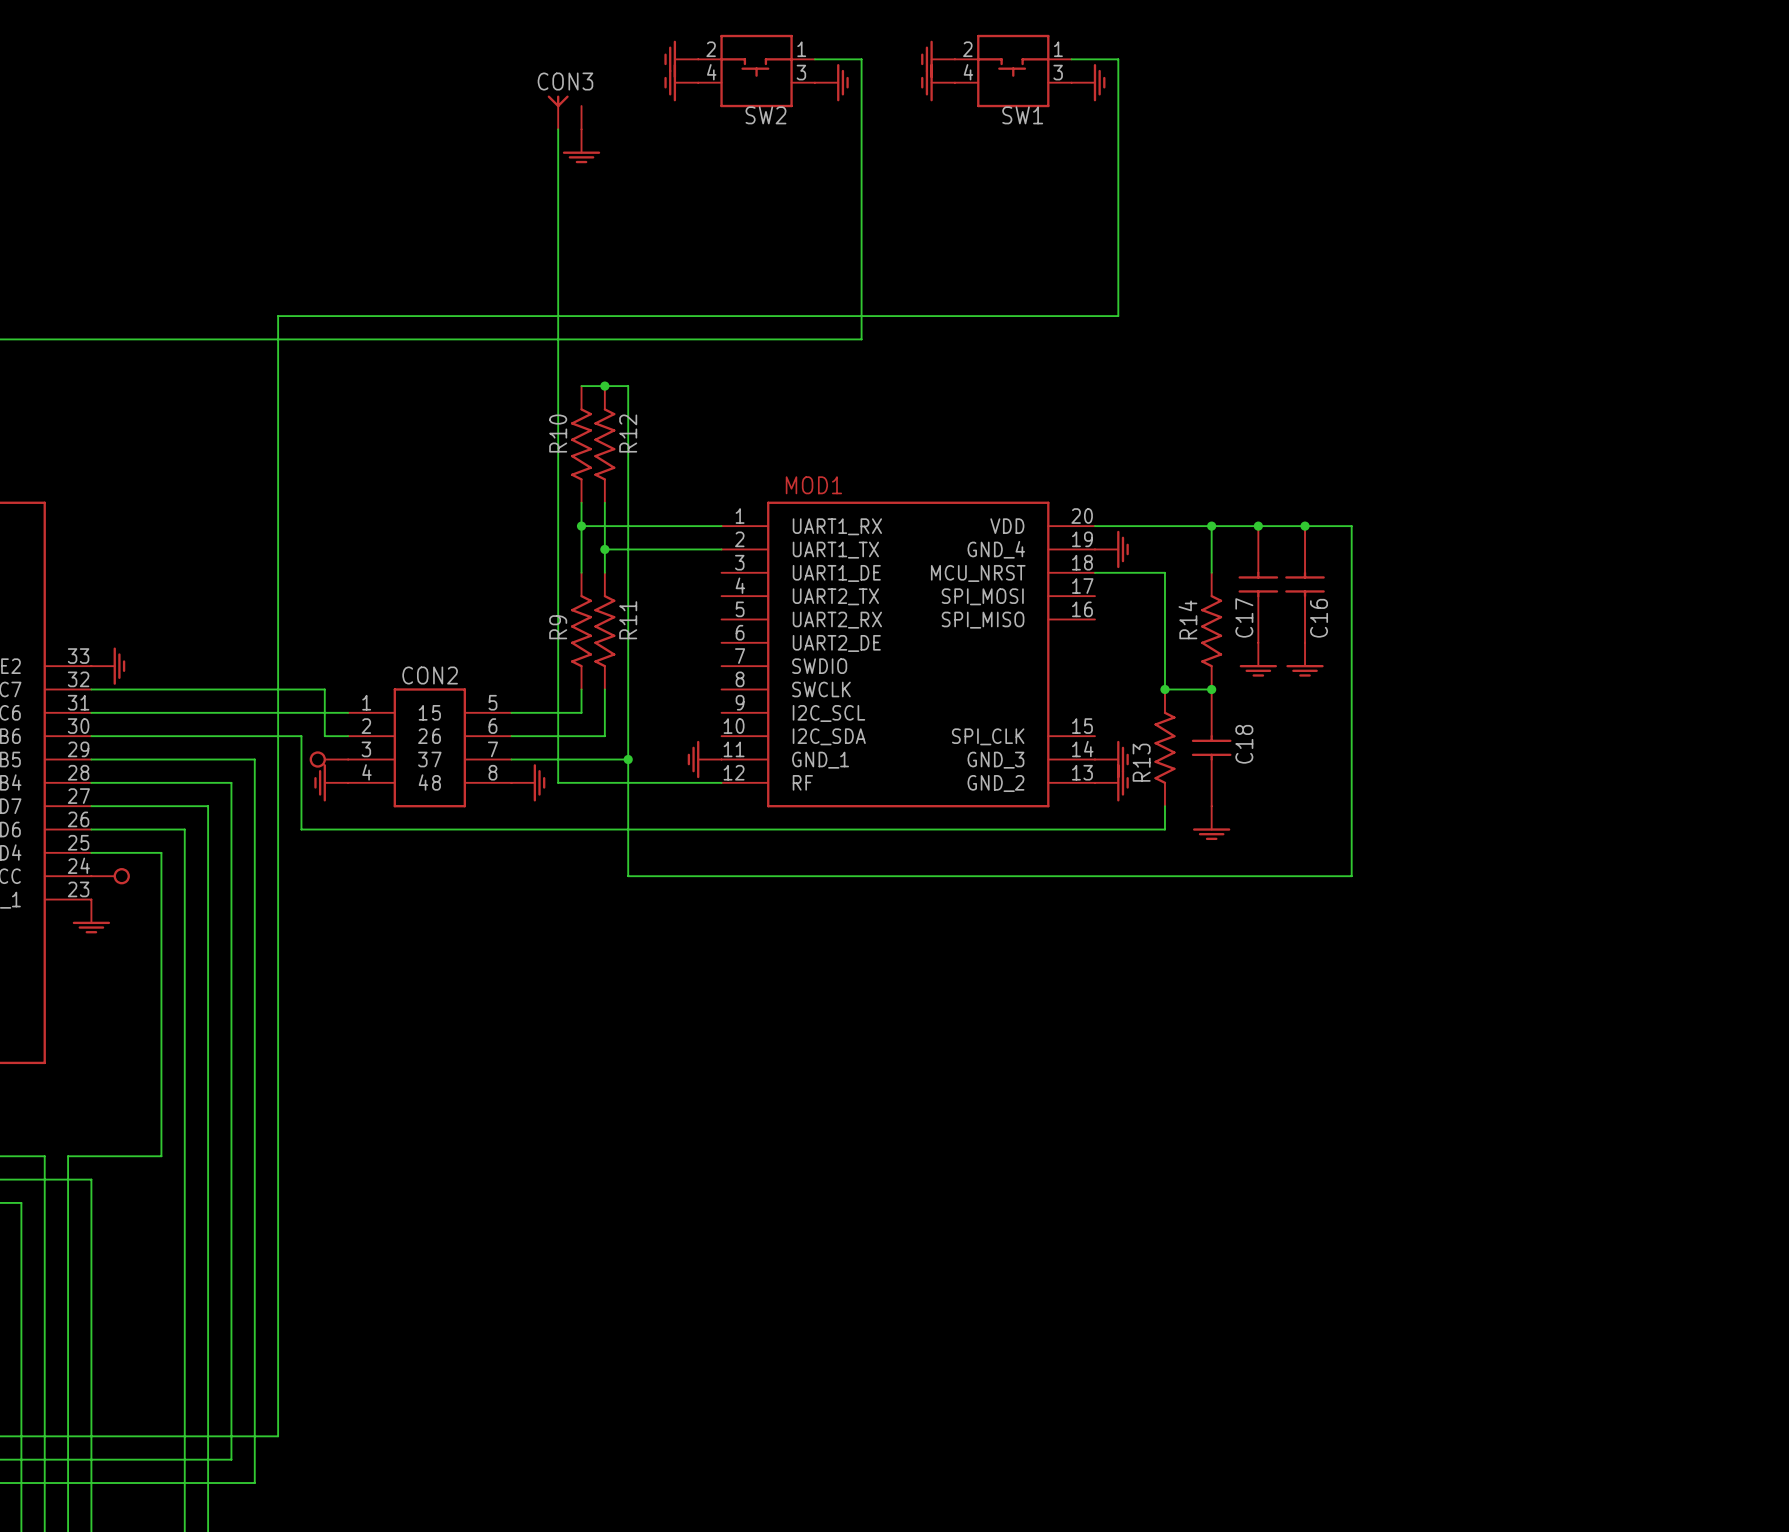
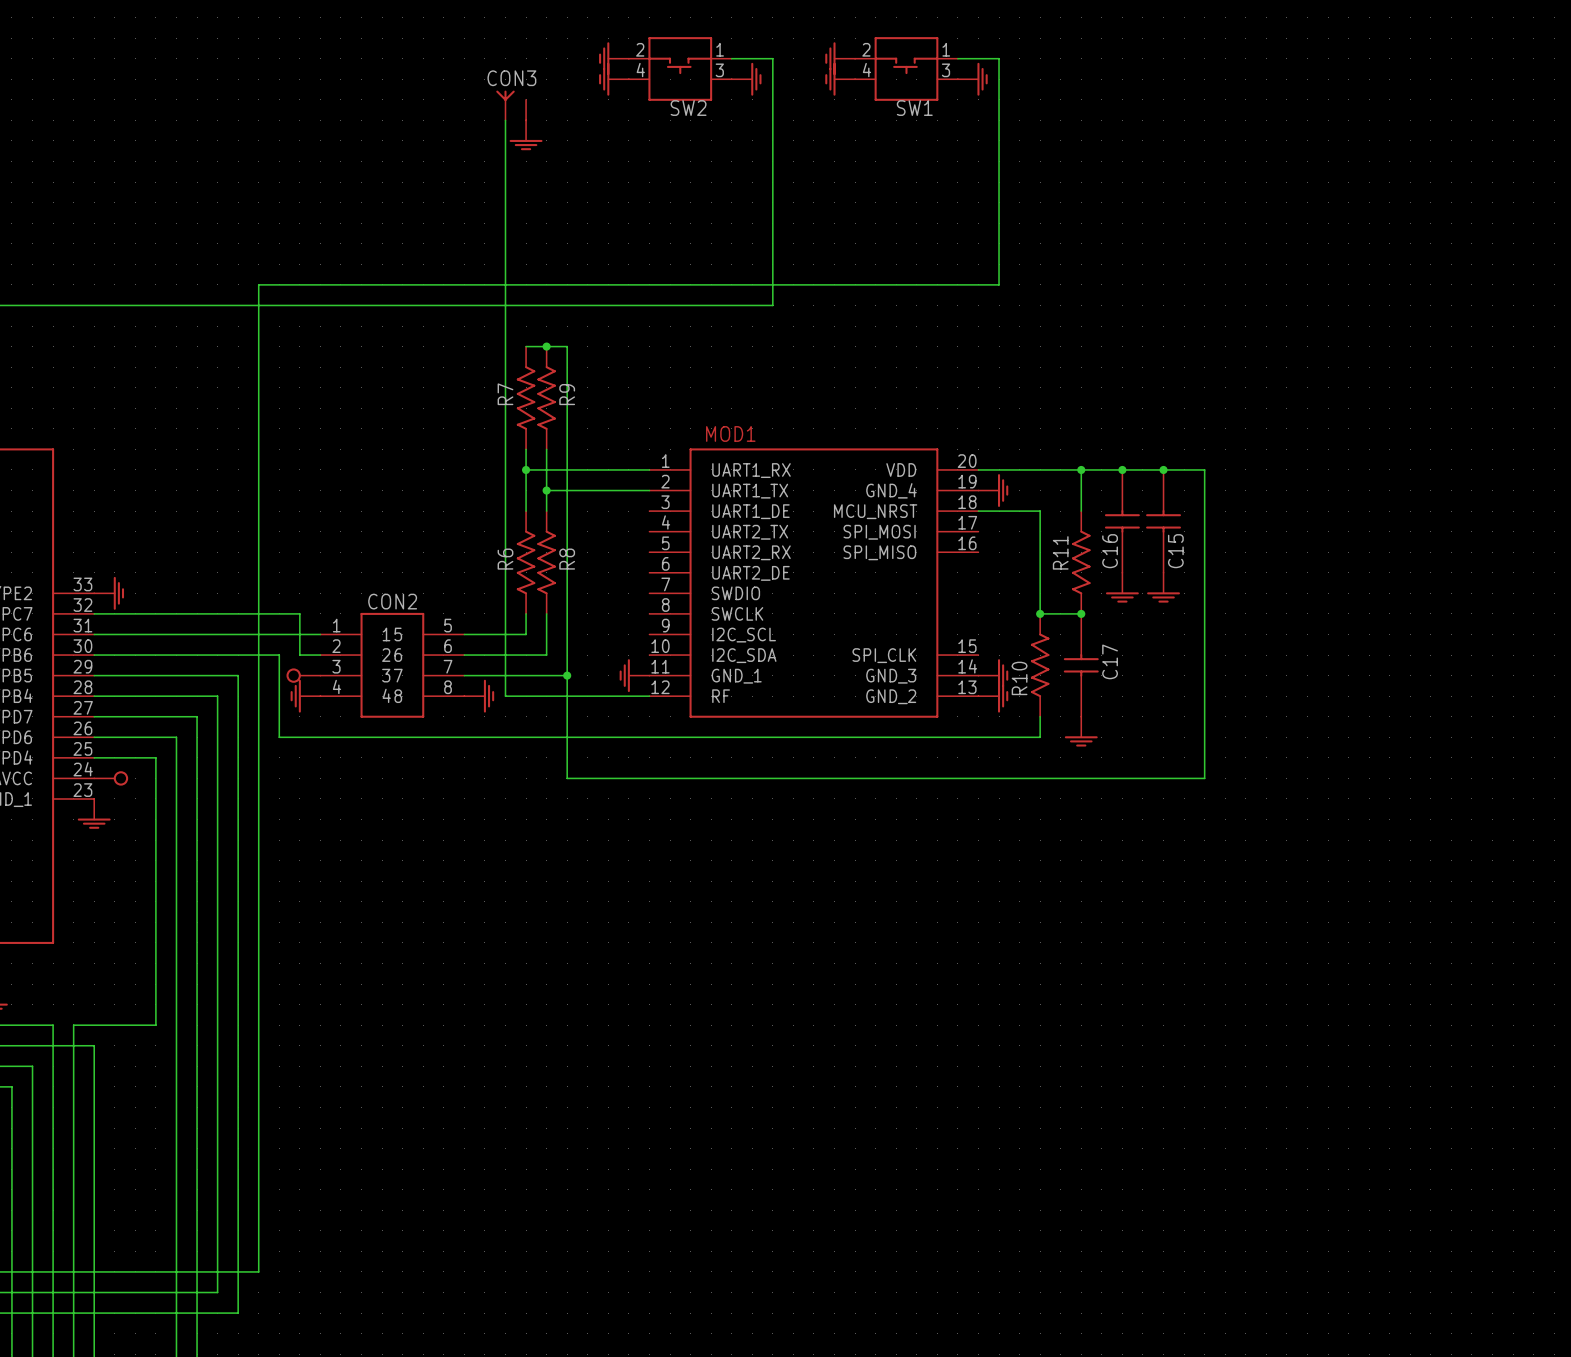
R10 name: R10 (558, 433) -> R7 (505, 394)
R12 name: R12 (628, 433) -> R9 (567, 394)
C17 name: C17 (1244, 617) -> C16 (1110, 551)
C16 name: C16 (1319, 618) -> C15 (1175, 551)
R14 name: R14 (1187, 619) -> R11 (1060, 552)
R11 name: R11 (628, 620) -> R8 (567, 559)
R9 name: R9 (558, 627) -> R6 (505, 559)
C18 name: C18 (1244, 744) -> C17 (1110, 661)
R13 name: R13 (1141, 762) -> R10 (1019, 678)

